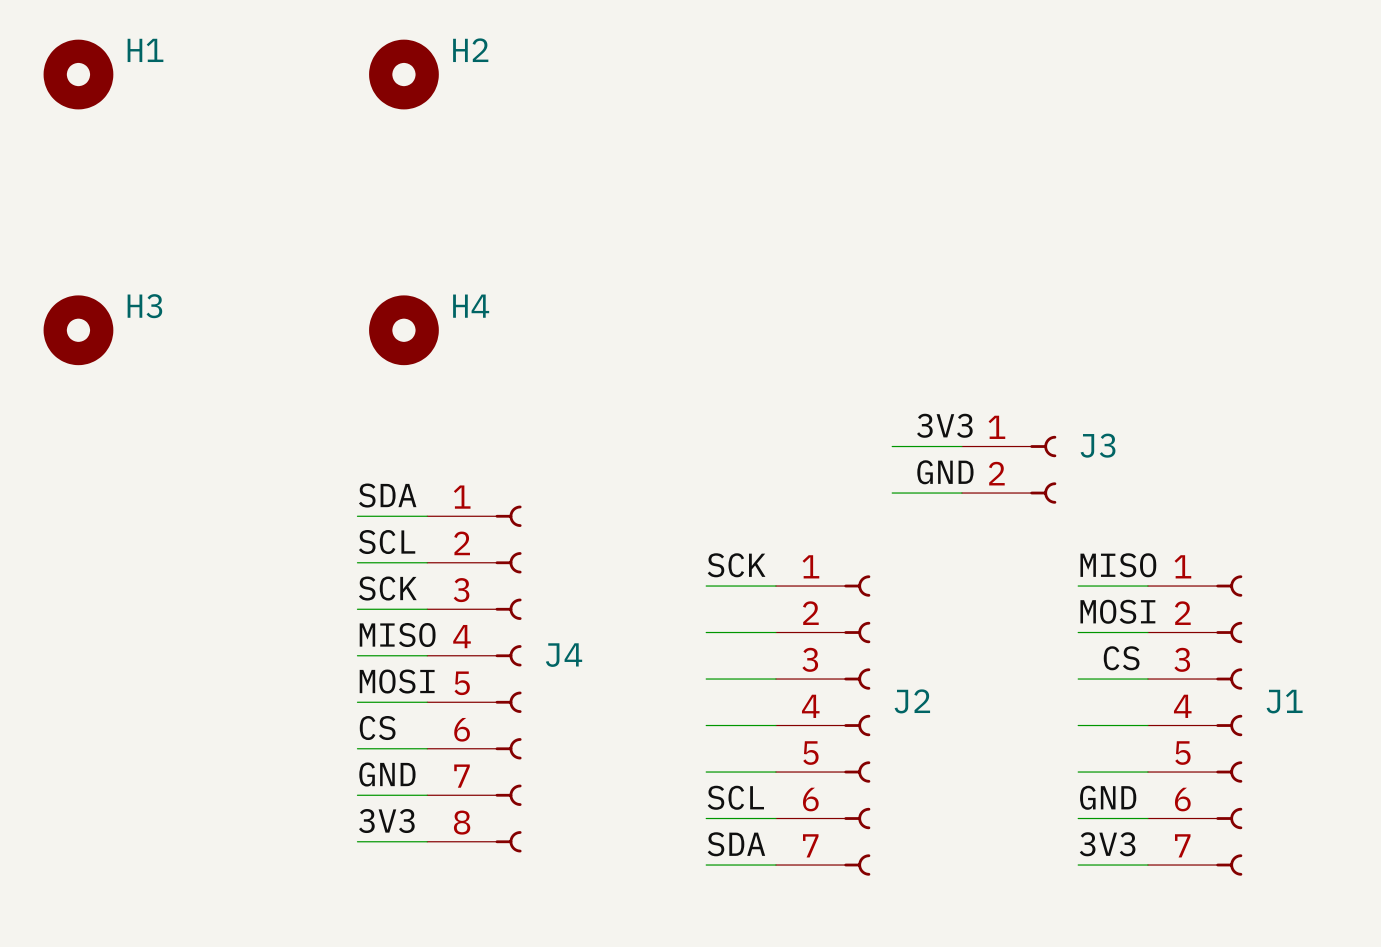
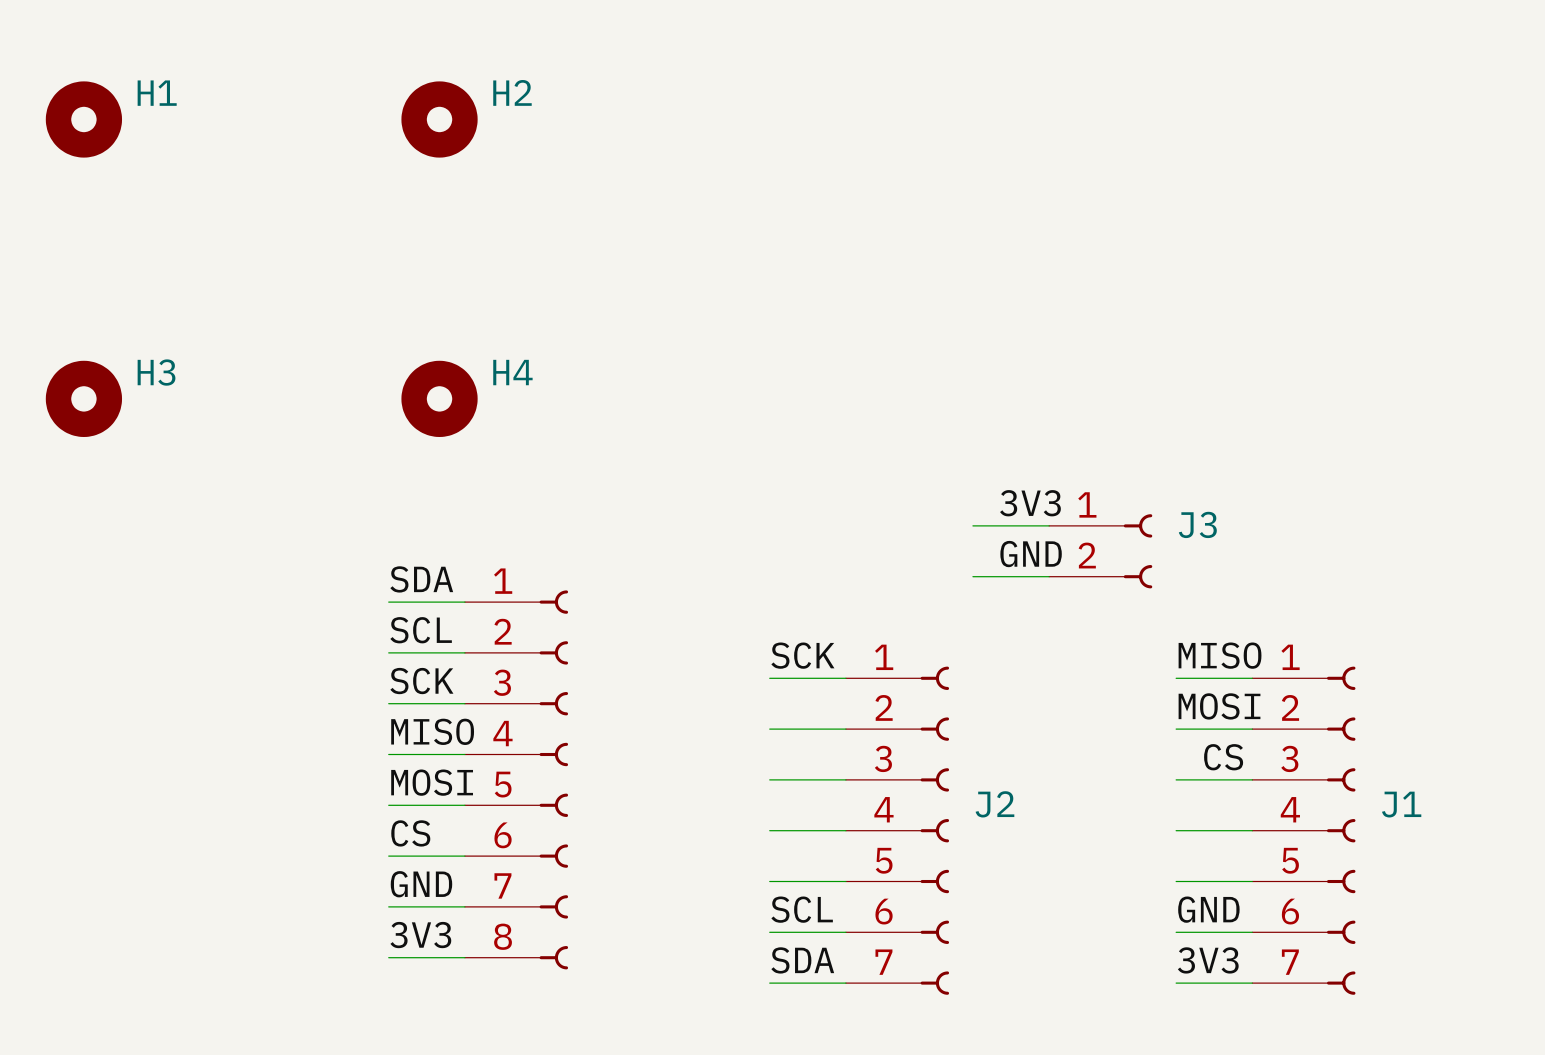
J4 name: J4 (564, 655) -> none

